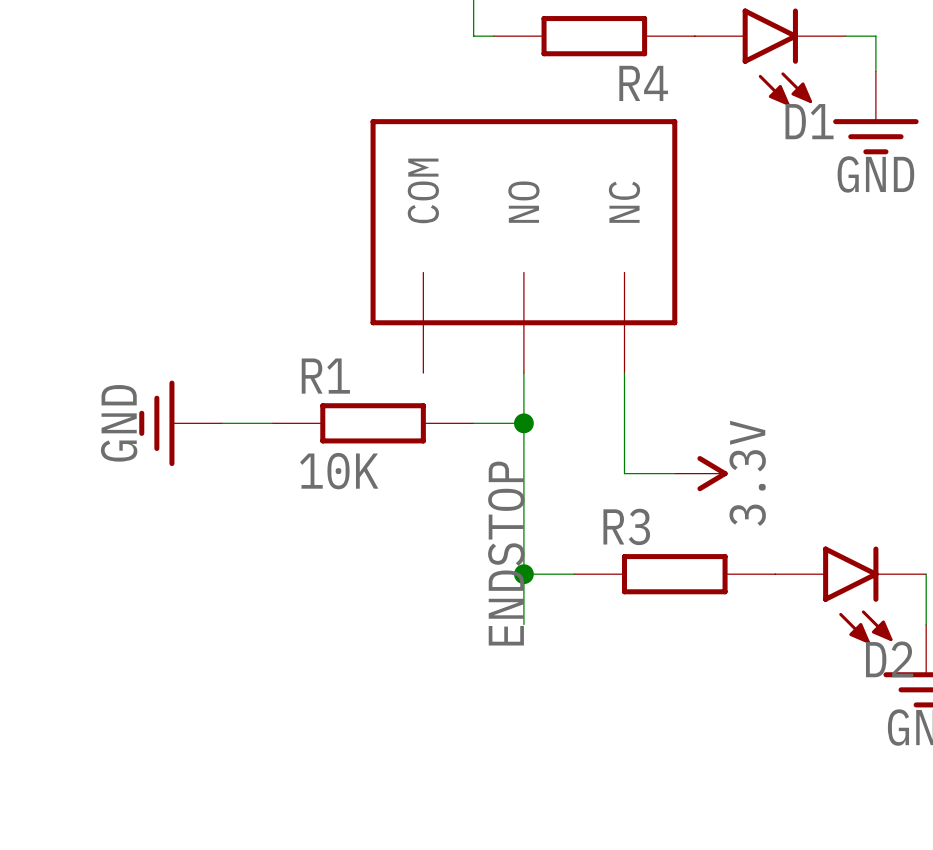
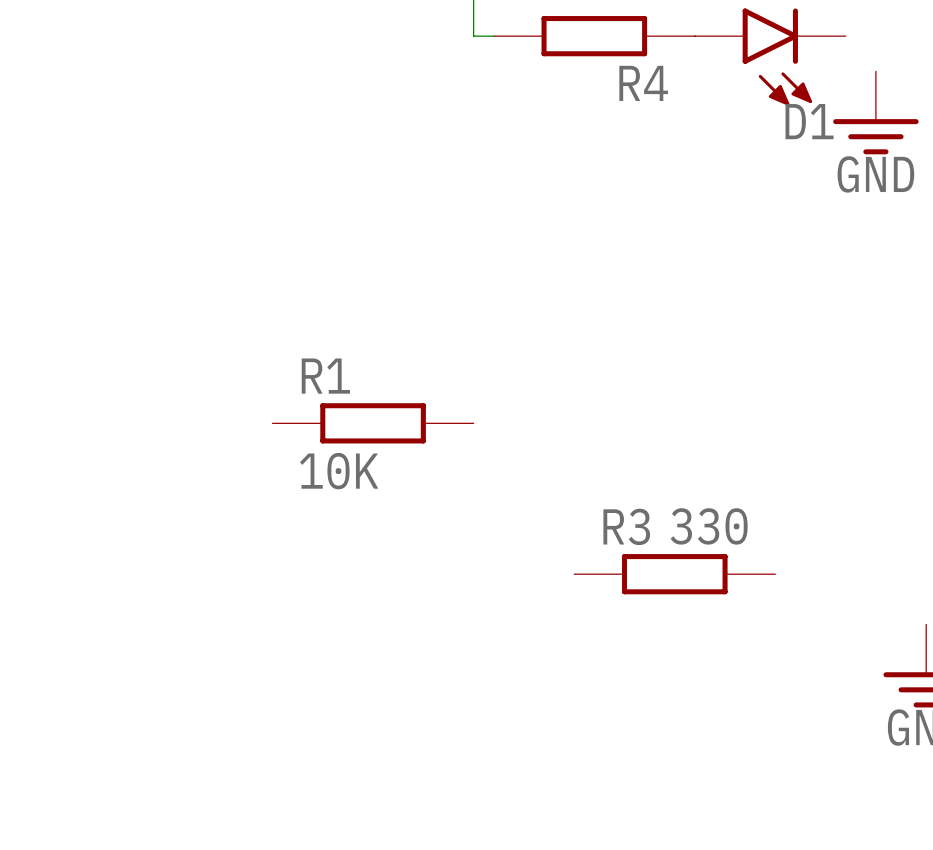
wire: (845, 36) (875, 36) (875, 71) -> none
part: (523, 246) -> none
wire: (523, 373) (523, 624) -> none
wire: (624, 373) (624, 473) (674, 473) -> none
power symbol: GND (180, 423) -> none
wire: (222, 423) (272, 423) -> none
wire: (473, 423) (523, 423) -> none
junction: (523, 423) -> none
power symbol: 3.3V (701, 473) -> none
R3 value: none -> 330 (709, 526)
label: ENDSTOP (506, 553) -> none
wire: (523, 574) (574, 574) -> none
junction: (523, 574) -> none
wire: (926, 574) (926, 624) -> none
D2: (850, 595) -> none

